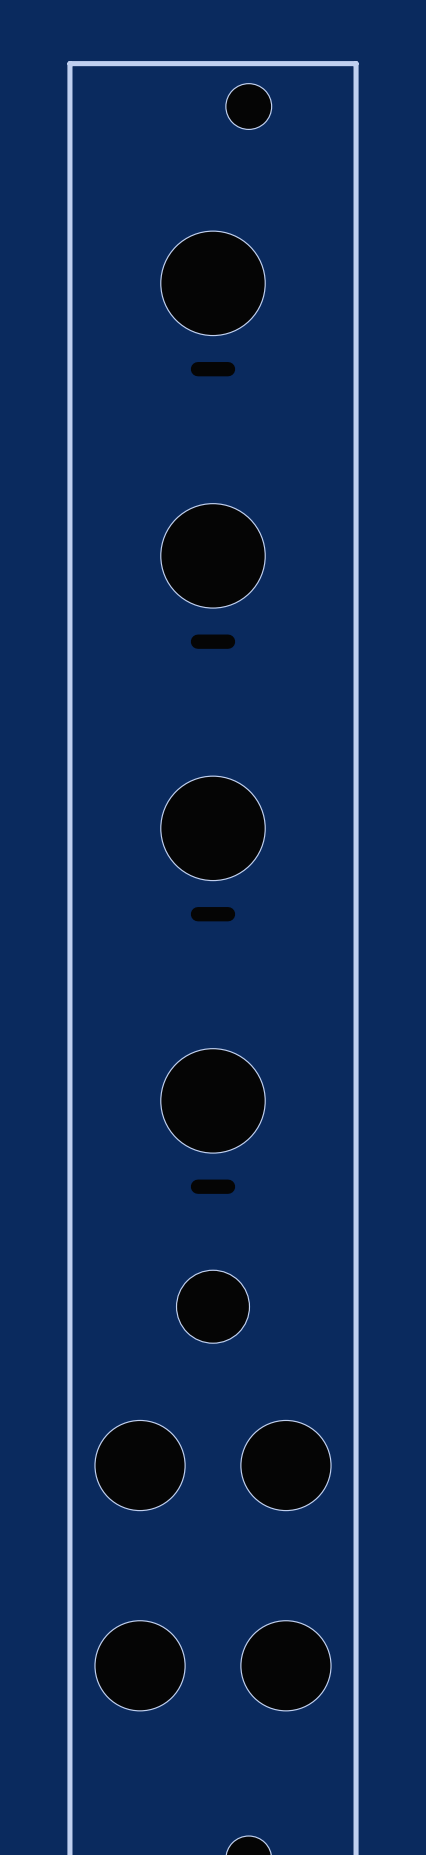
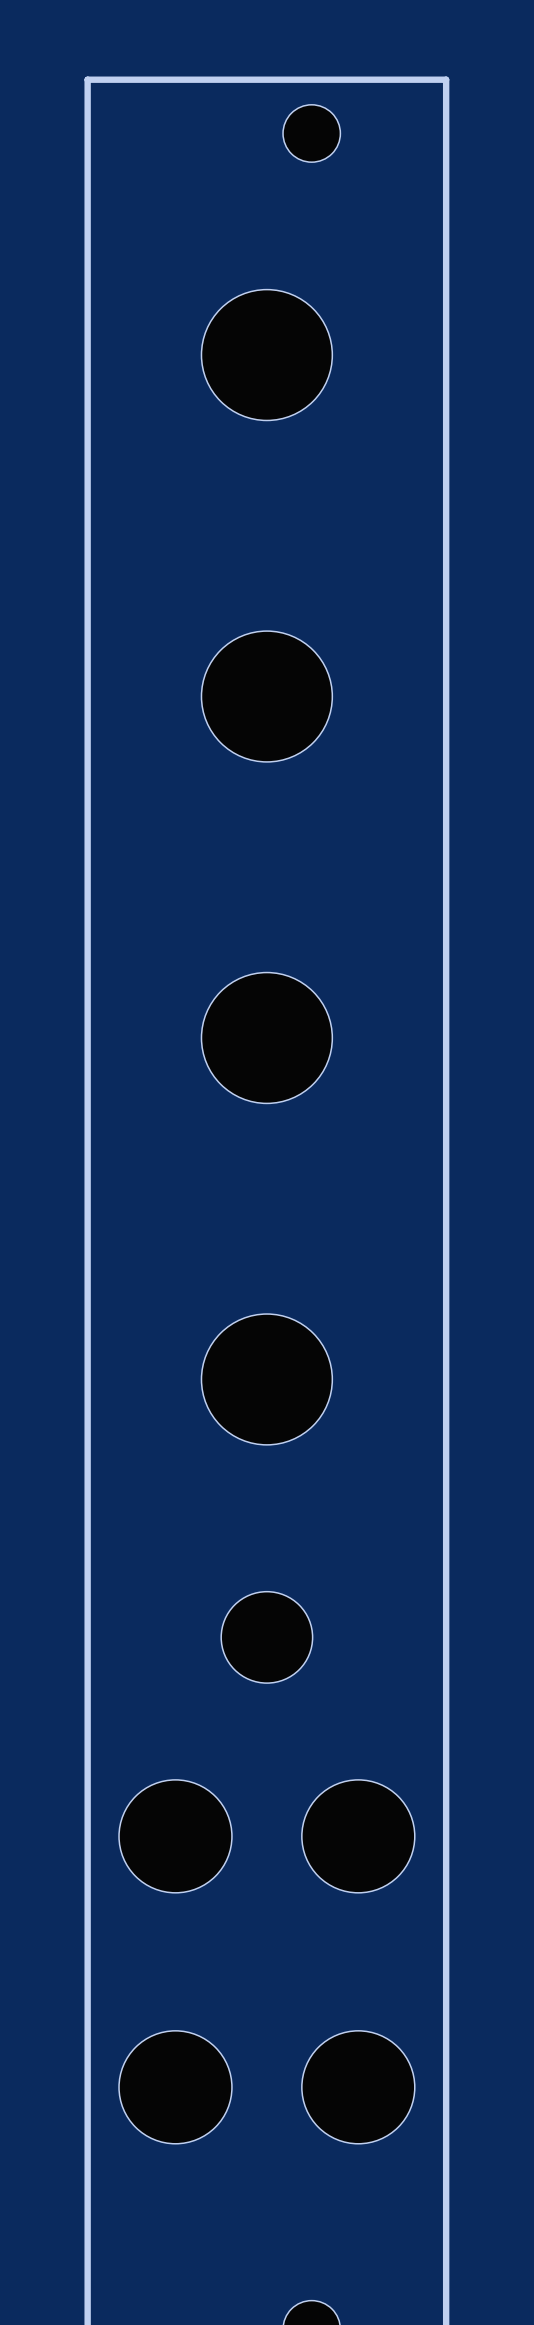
part: (213, 303) -> none
part: (213, 576) -> none
part: (213, 848) -> none
part: (213, 1121) -> none

